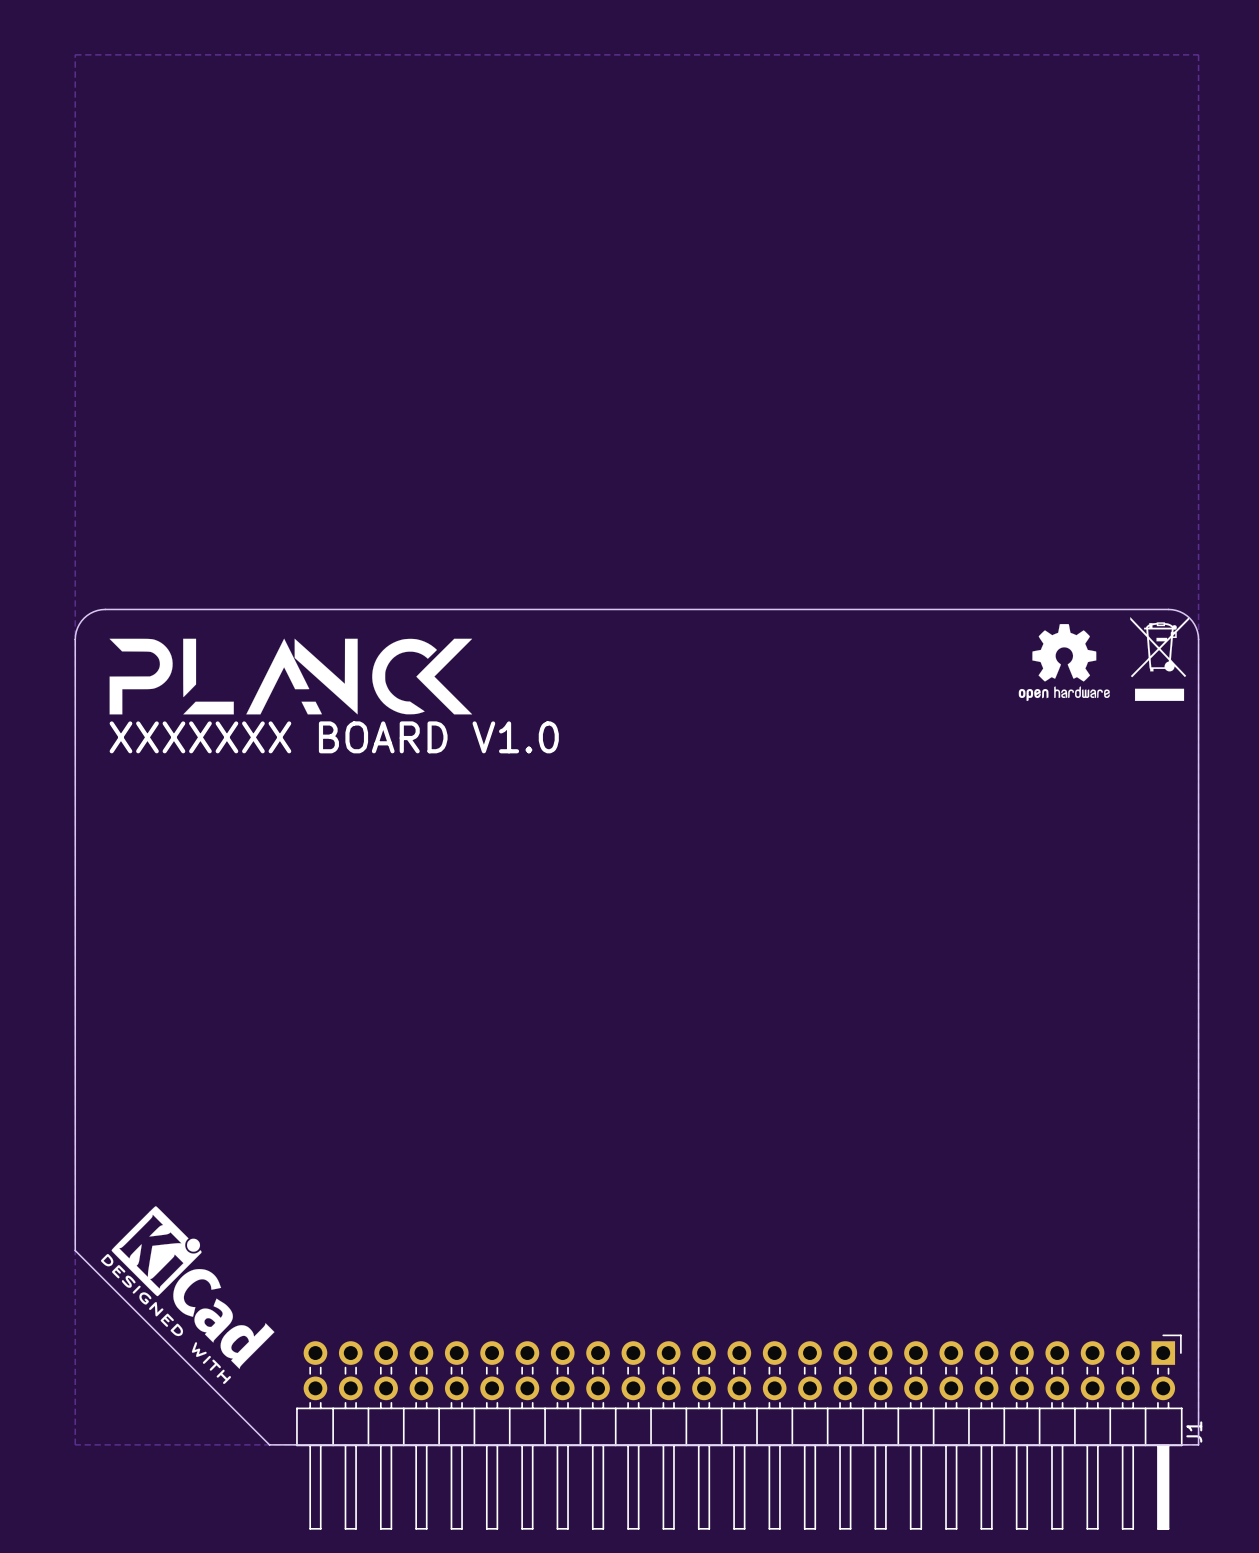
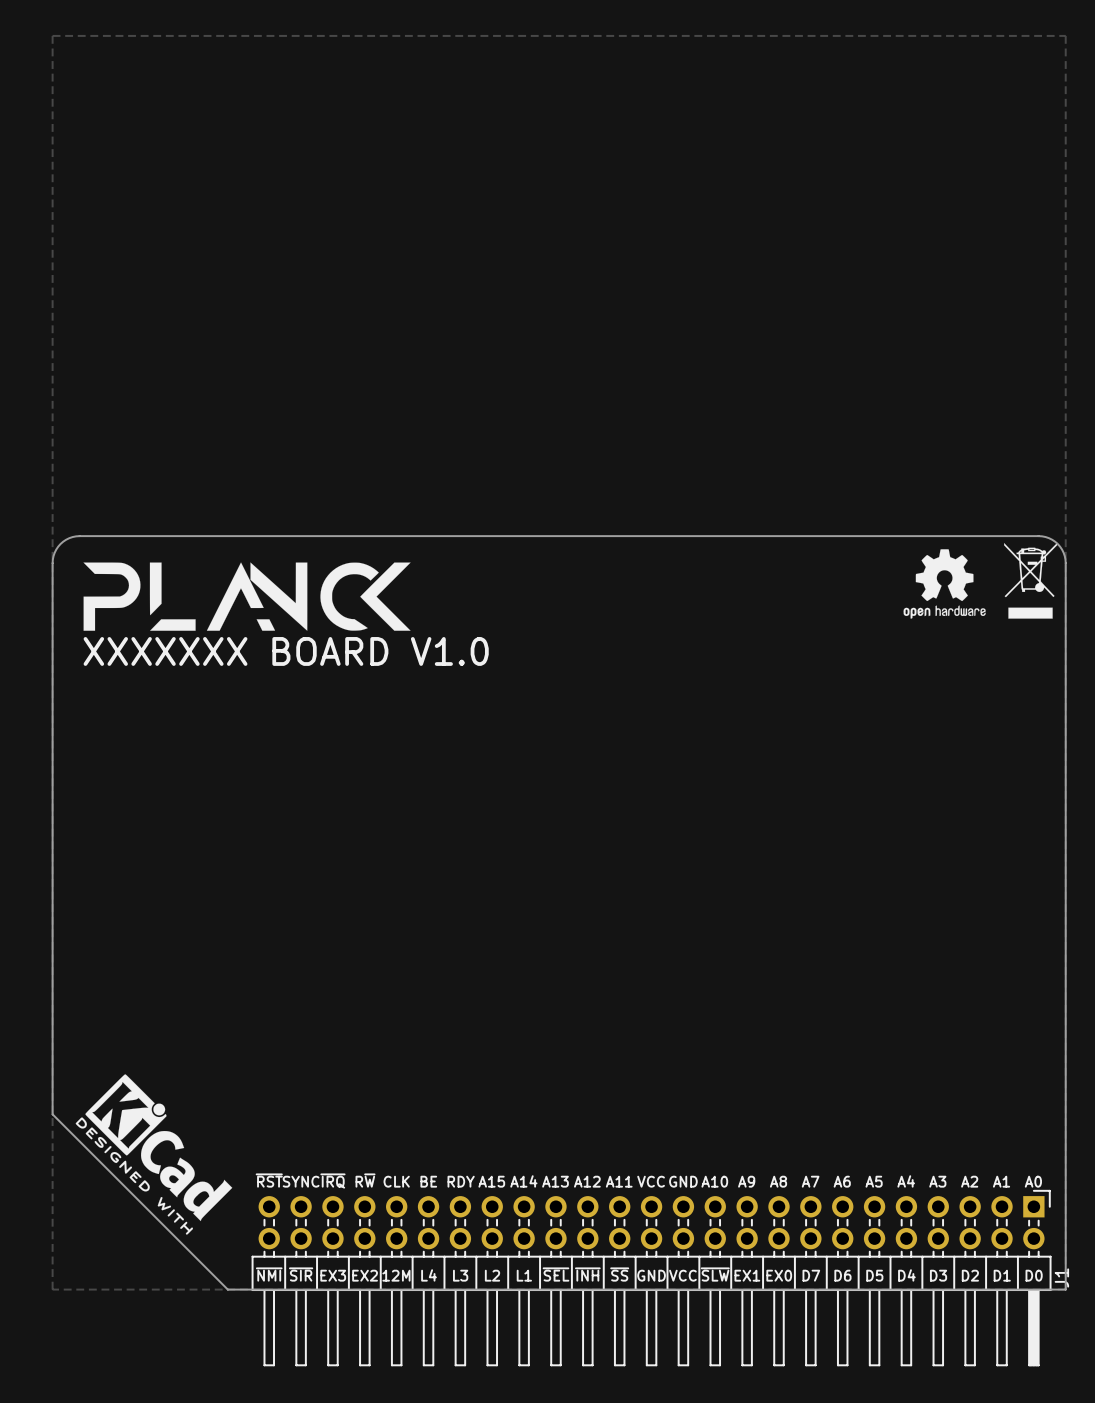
text: none -> ~{RST} (269, 1180)
text: none -> R~{W} (365, 1180)
text: none -> ~{IRQ} (332, 1181)
text: none -> A14 (523, 1181)
text: none -> A4 (906, 1181)
text: none -> SYNC (301, 1181)
text: none -> CLK (396, 1181)
text: none -> BE (428, 1181)
text: none -> RDY (461, 1181)
text: none -> A15 (491, 1181)
text: none -> A13 (555, 1181)
text: none -> A12 (587, 1181)
text: none -> A11 (619, 1181)
text: none -> VCC (651, 1181)
text: none -> GND (683, 1181)
text: none -> A10 (714, 1181)
text: none -> A9 (746, 1181)
text: none -> A8 (778, 1181)
text: none -> A7 (810, 1181)
text: none -> A6 (842, 1181)
text: none -> A5 (874, 1181)
text: none -> A3 (937, 1181)
text: none -> A2 (969, 1181)
text: none -> A1 (1001, 1181)
text: none -> A0 (1033, 1181)
text: none -> ~{NMI} (269, 1274)
text: none -> ~{SIR} (301, 1274)
text: none -> ~{SEL} (556, 1274)
text: none -> ~{INH} (587, 1274)
text: none -> ~{SS} (619, 1274)
text: none -> ~{SLW} (715, 1274)
text: none -> EX3 (333, 1275)
text: none -> EX2 (365, 1275)
text: none -> 12M (396, 1275)
text: none -> L4 (429, 1275)
text: none -> L3 (460, 1275)
text: none -> L2 (492, 1275)
text: none -> L1 (524, 1275)
text: none -> GND (651, 1275)
text: none -> VCC (682, 1275)
text: none -> EX1 (747, 1275)
text: none -> EX0 (779, 1275)
text: none -> D7 (811, 1275)
text: none -> D6 (842, 1275)
text: none -> D5 (874, 1275)
text: none -> D4 (906, 1275)
text: none -> D3 (938, 1275)
text: none -> D2 (970, 1275)
text: none -> D1 (1002, 1275)
text: none -> D0 (1034, 1275)

